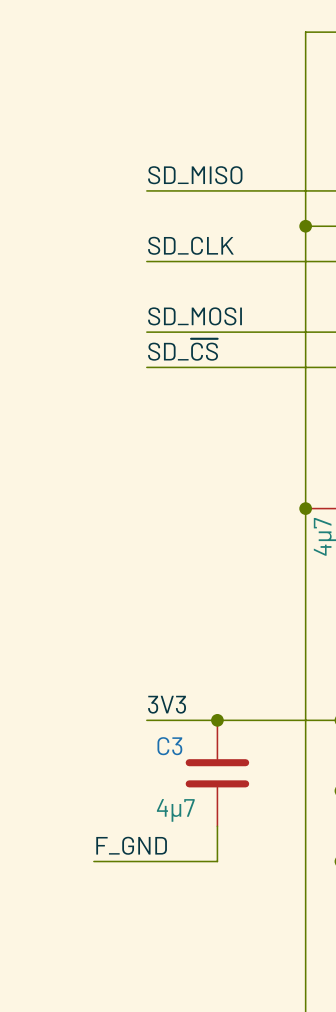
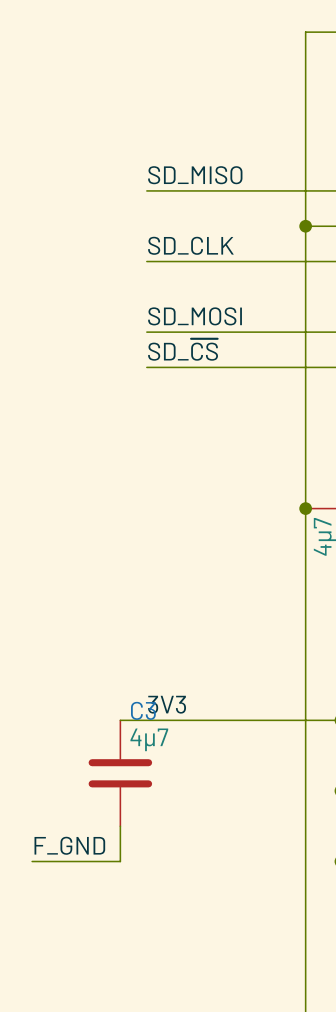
wire: none -> (120, 720) (146, 720)
junction: (217, 720) -> none
C3 name position: C3 (169, 746) -> C3 (143, 710)
C3 position: (217, 773) -> (120, 773)
C3 value position: 4µ7 (175, 810) -> 4µ7 (149, 739)
wire: (217, 826) (217, 861) (120, 861) -> (120, 826) (120, 861)
label position: F_GND (131, 845) -> F_GND (69, 845)
wire: none -> (32, 861) (93, 861)

